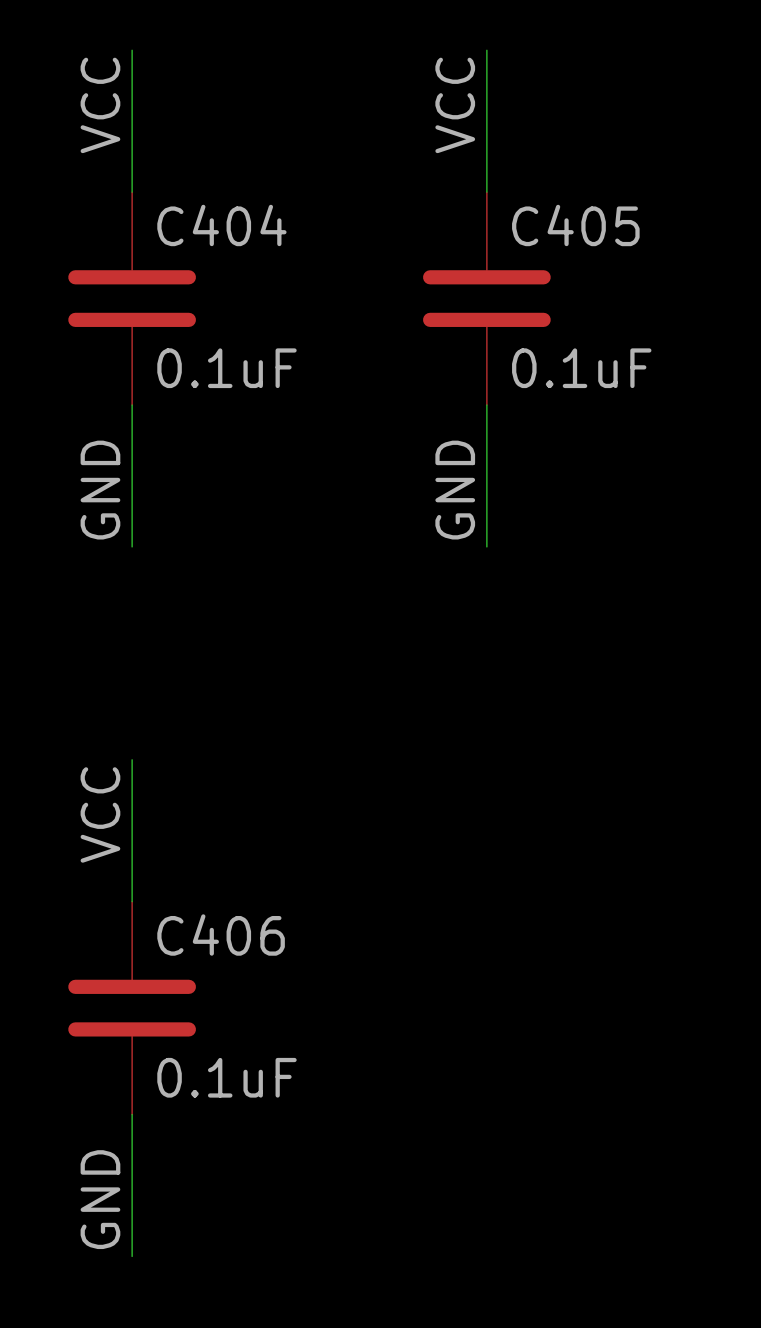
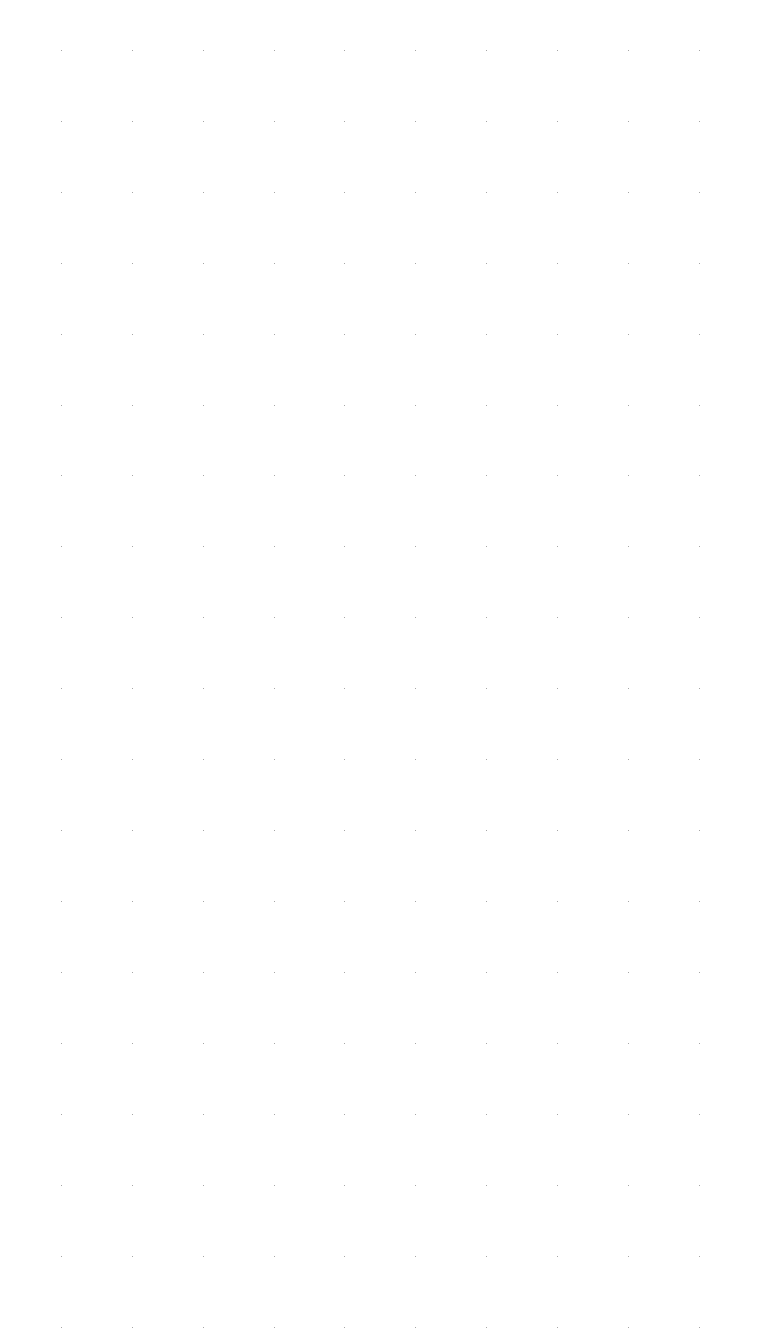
wire: (132, 50) (132, 192) -> none
wire: (486, 50) (486, 192) -> none
label: VCC (100, 105) -> none
label: VCC (455, 105) -> none
C404: 0.1uF (132, 298) -> none
C405: 0.1uF (486, 298) -> none
wire: (132, 405) (132, 546) -> none
wire: (486, 405) (486, 546) -> none
label: GND (100, 490) -> none
label: GND (455, 490) -> none
wire: (132, 759) (132, 901) -> none
label: VCC (100, 814) -> none
C406: 0.1uF (132, 1008) -> none
wire: (132, 1114) (132, 1256) -> none
label: GND (100, 1199) -> none

